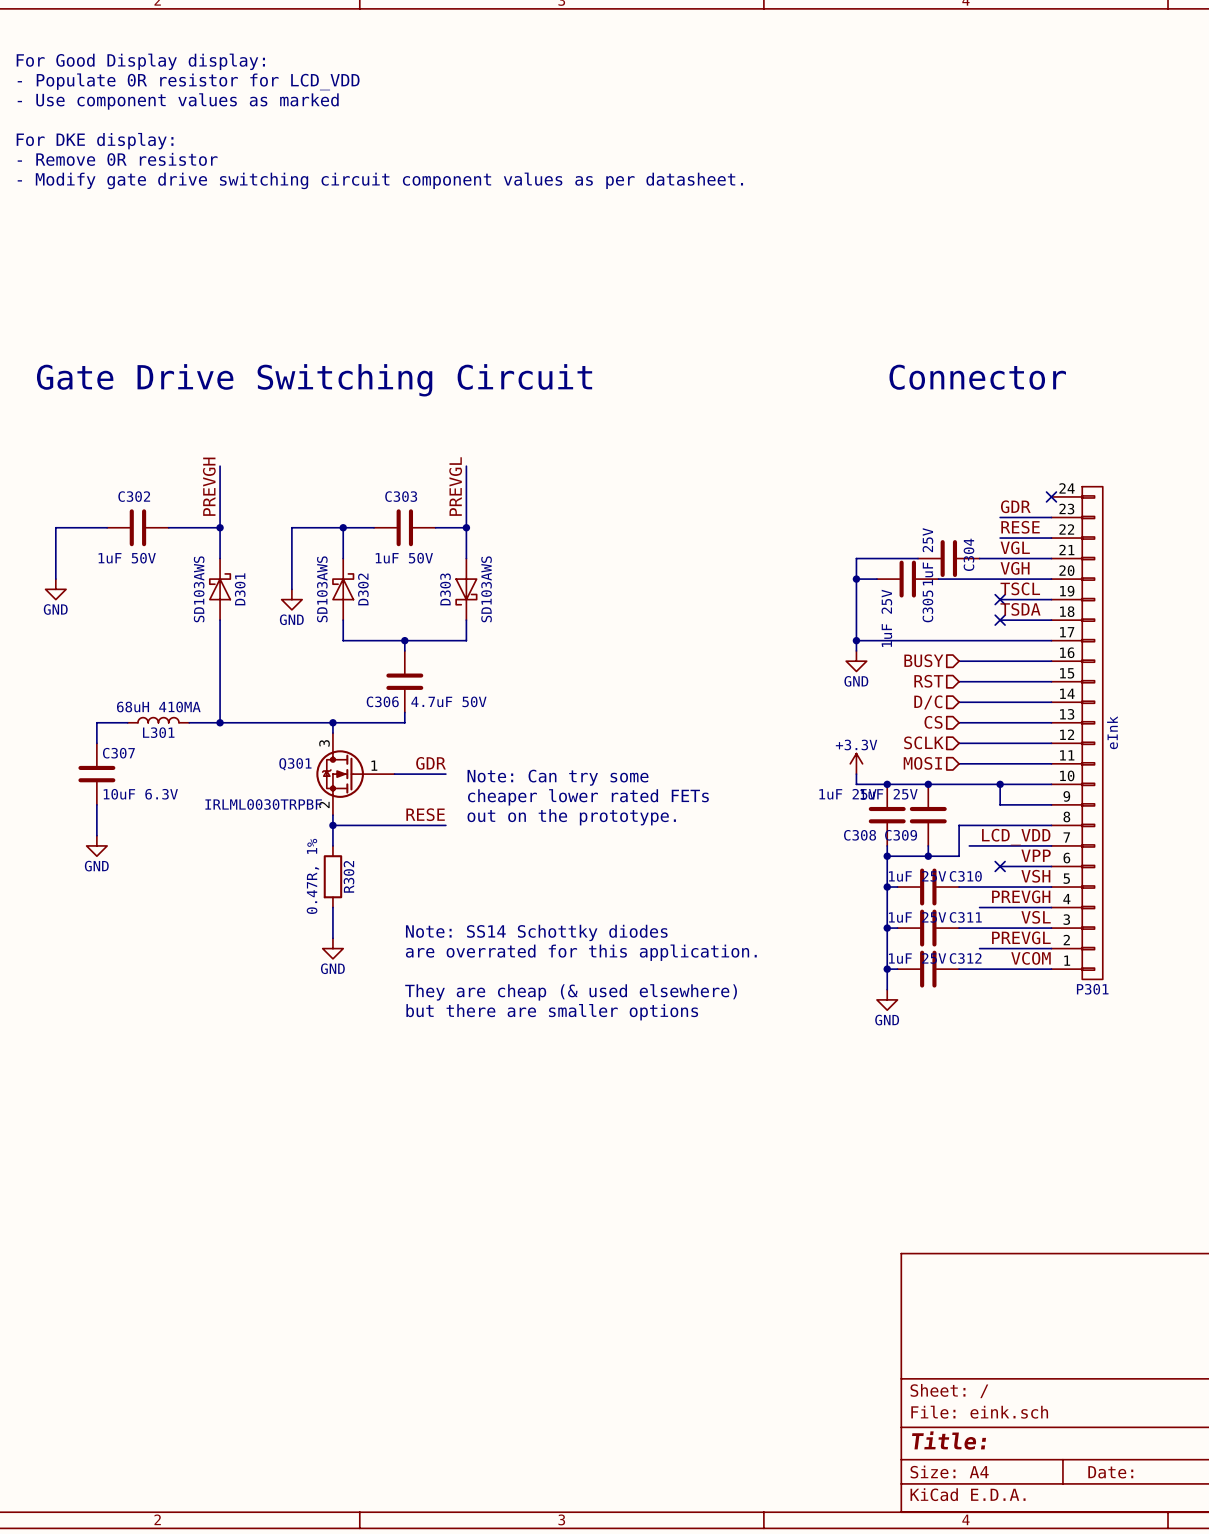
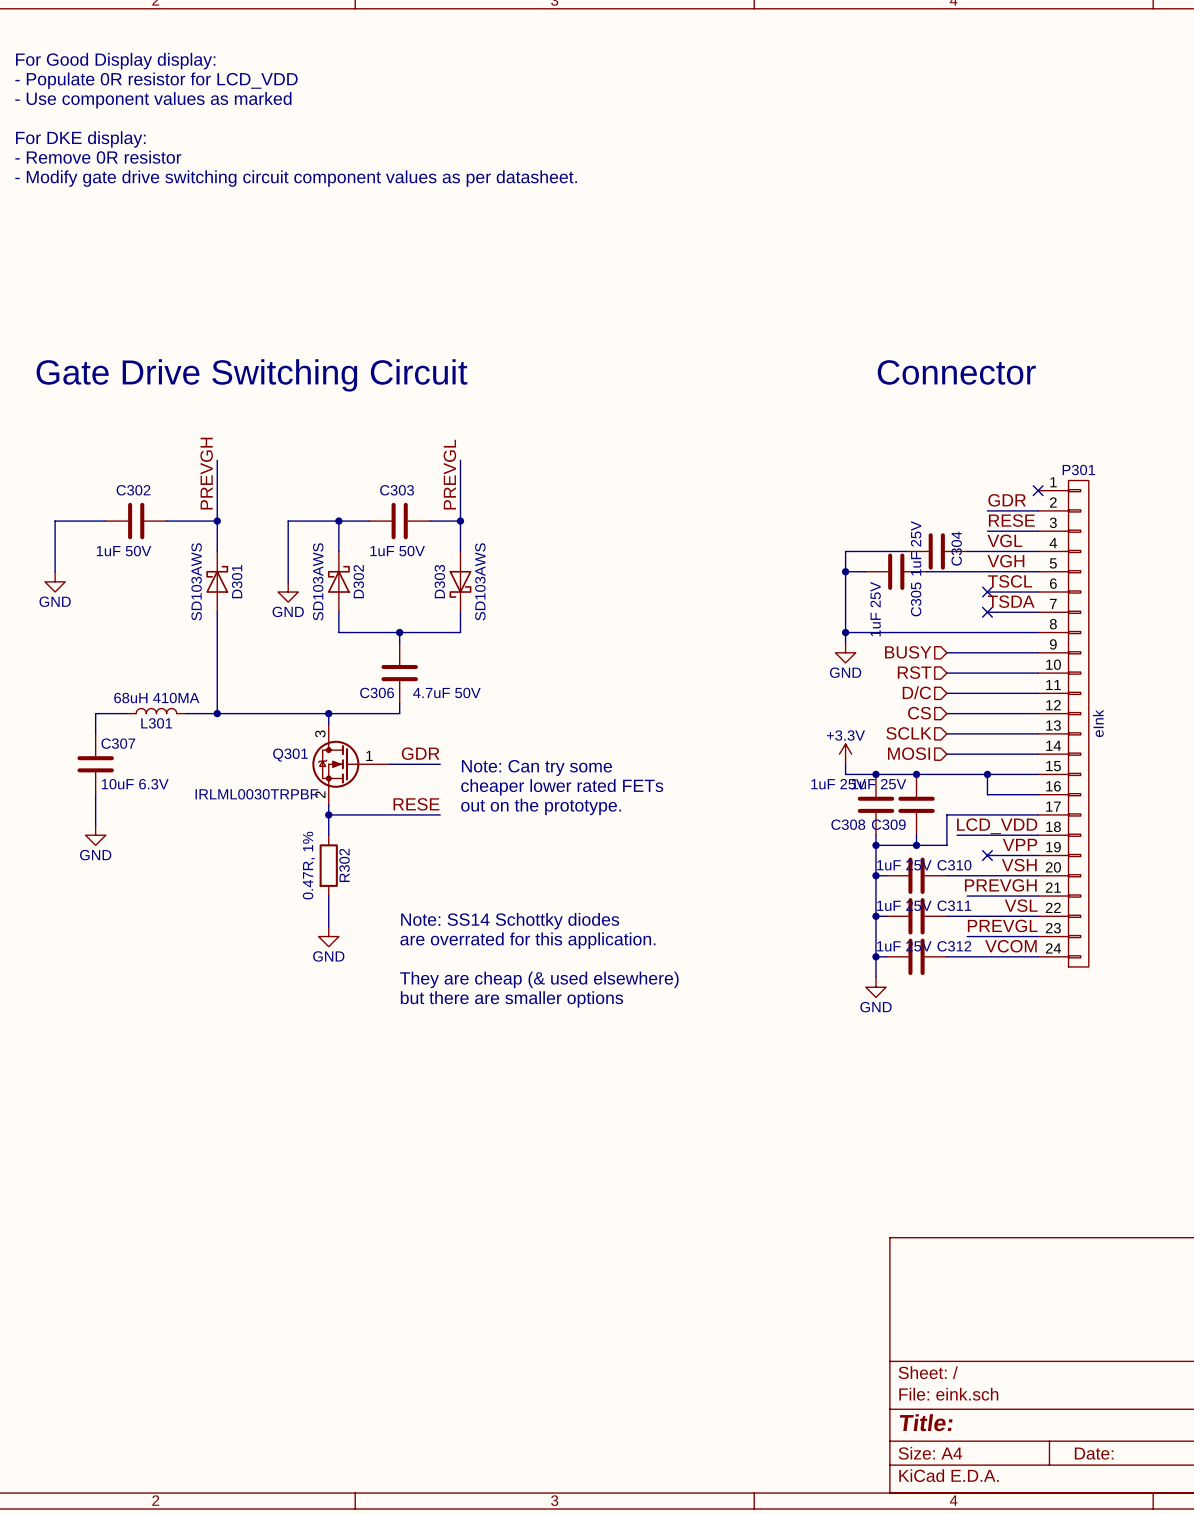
P301 flip: as is (1092, 733) -> up-down (1078, 723)

